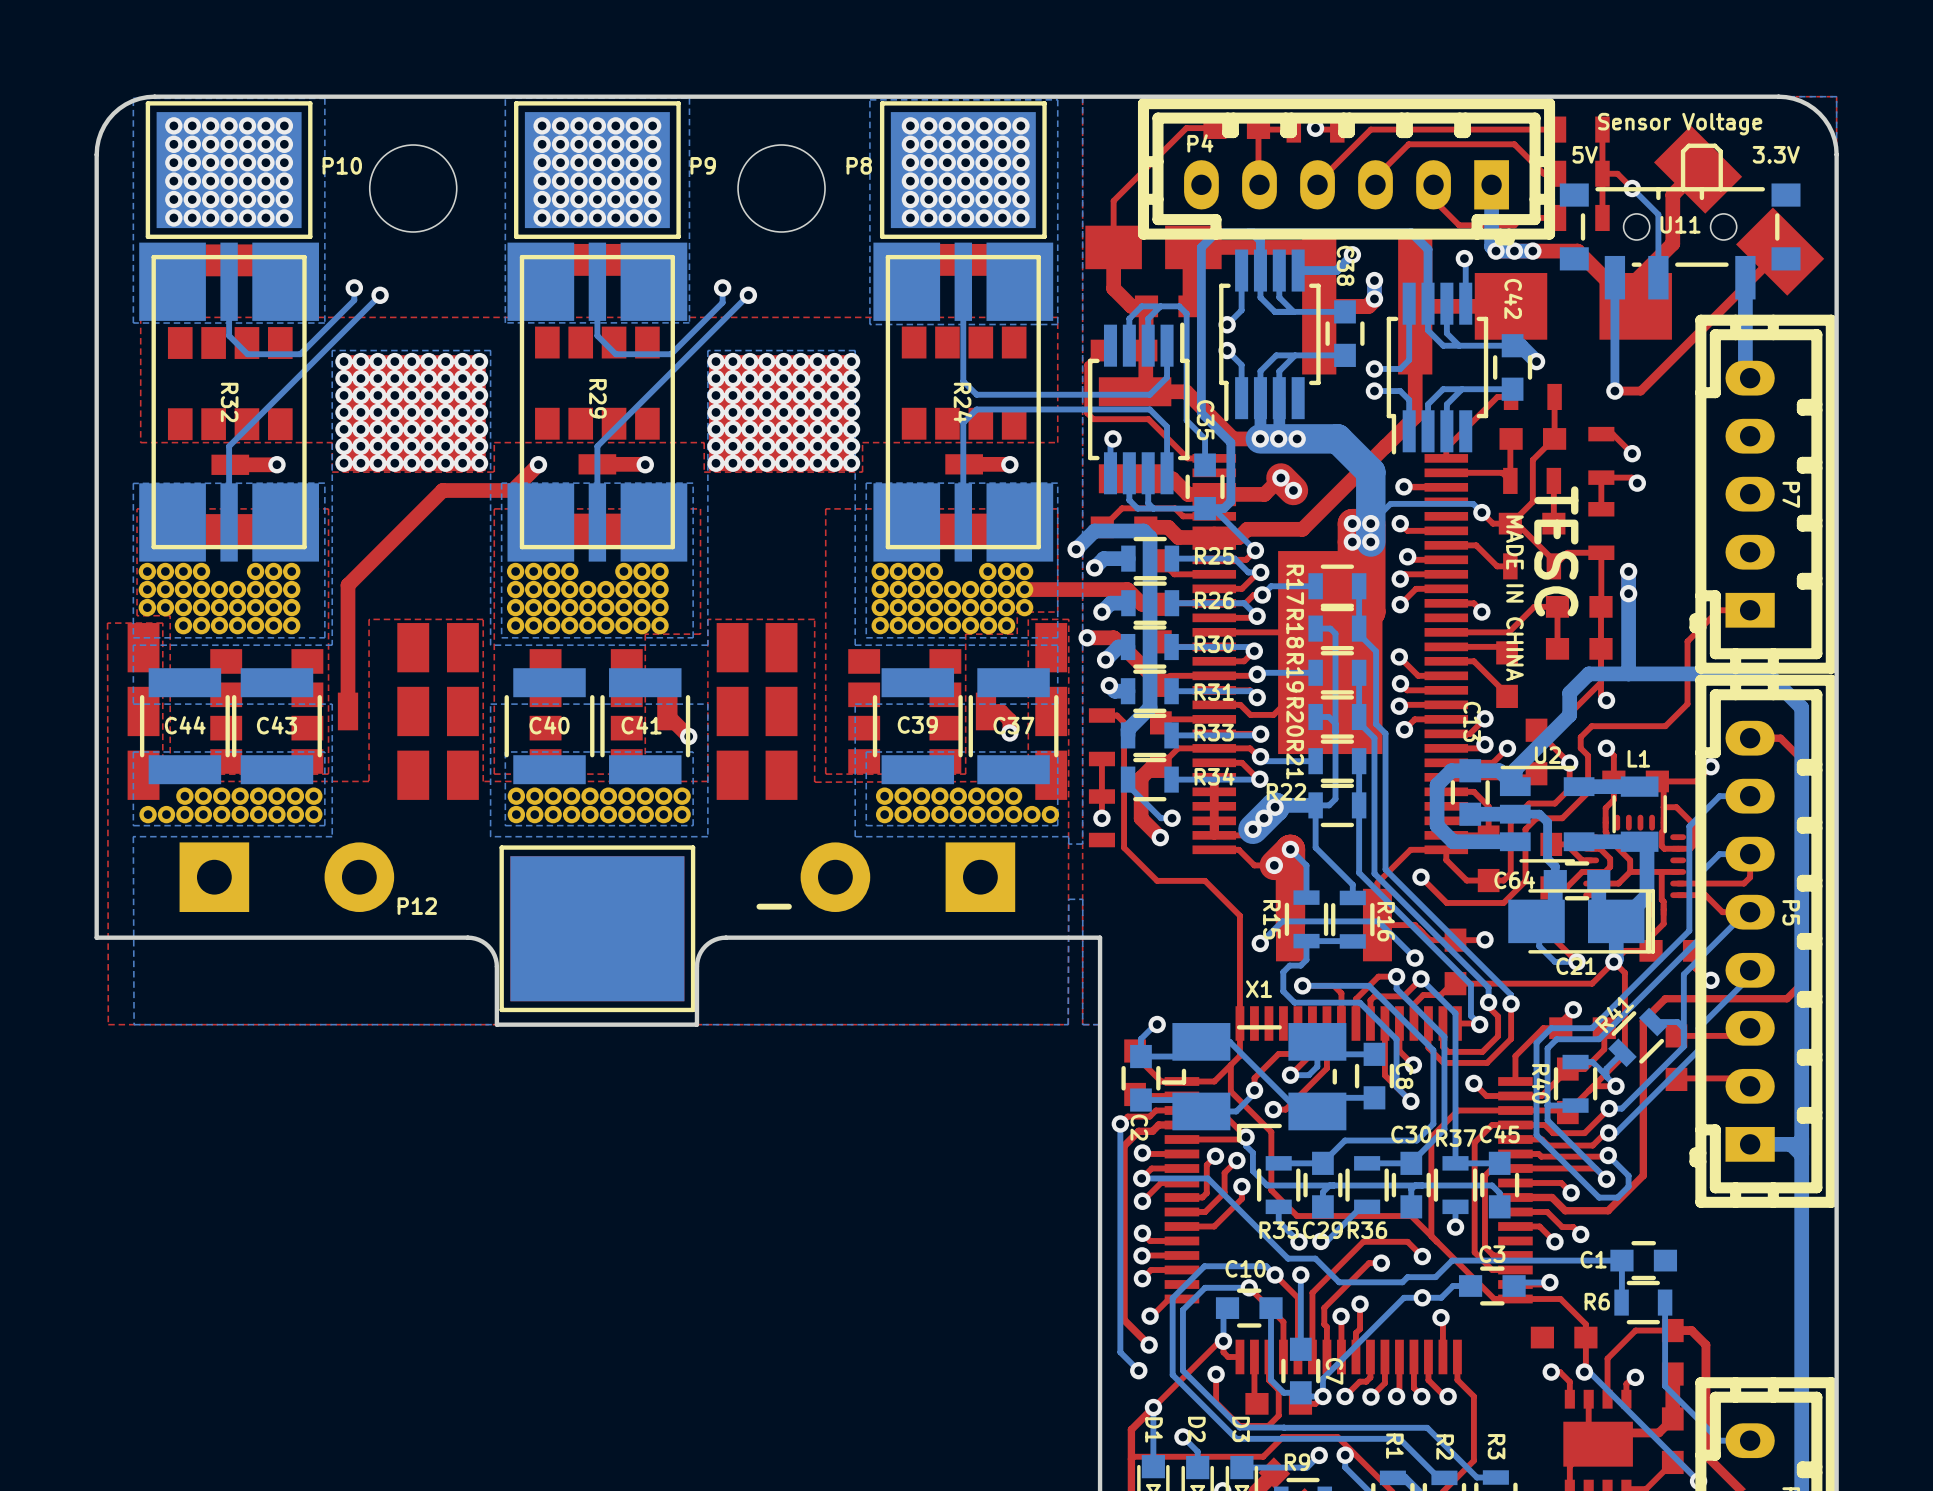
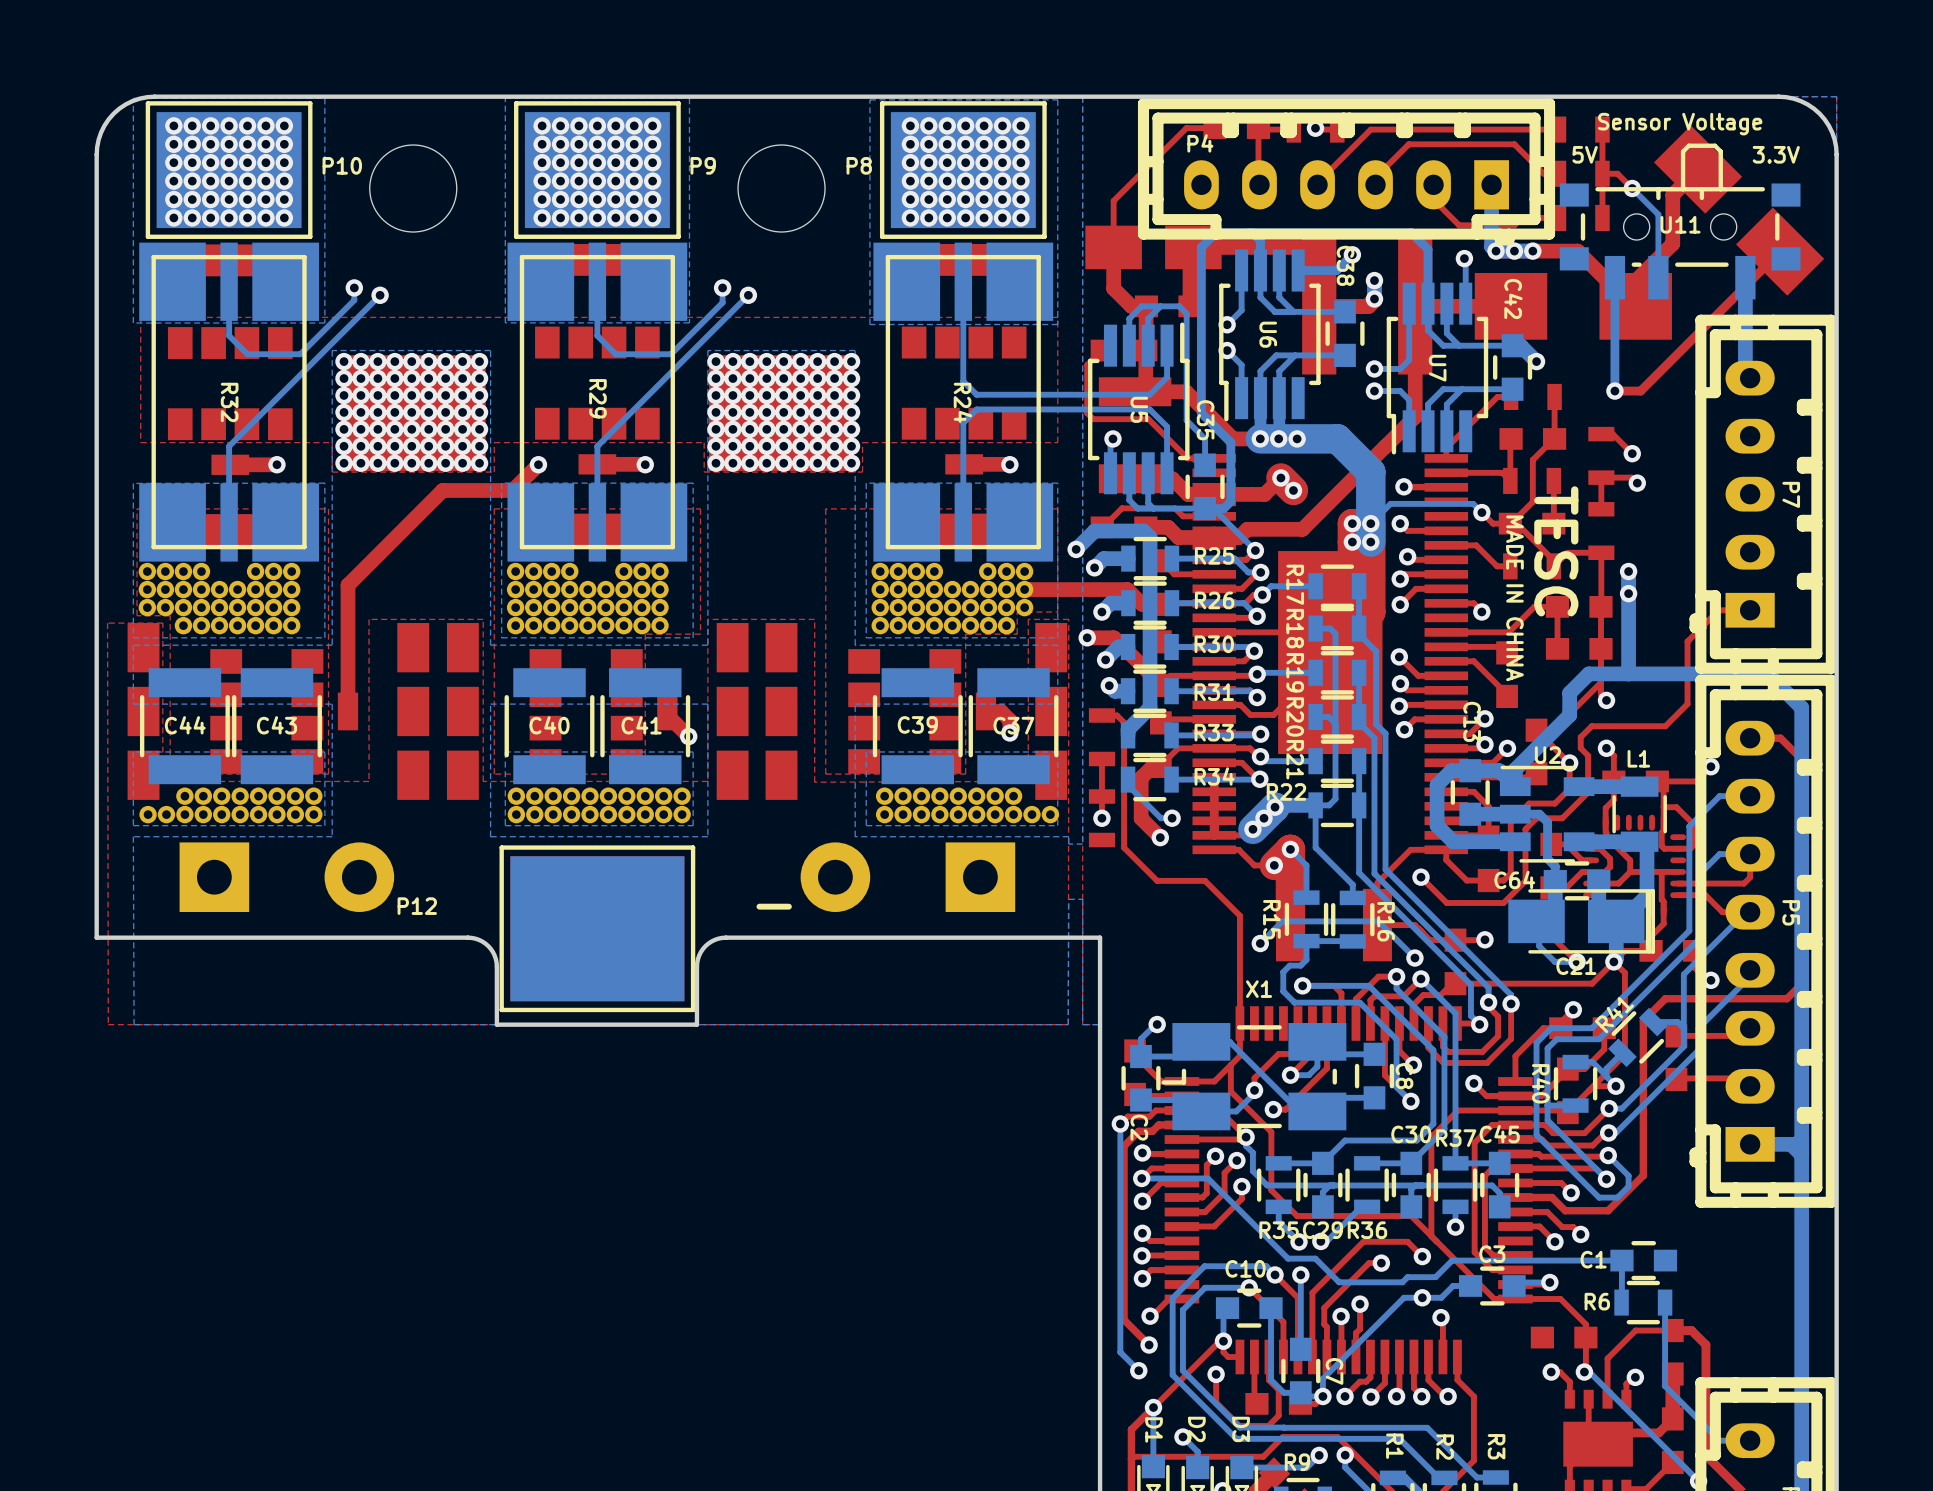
U6 name: none -> U6 (1268, 334)
U7 name: none -> U7 (1437, 368)
U5 name: none -> U5 (1139, 409)

